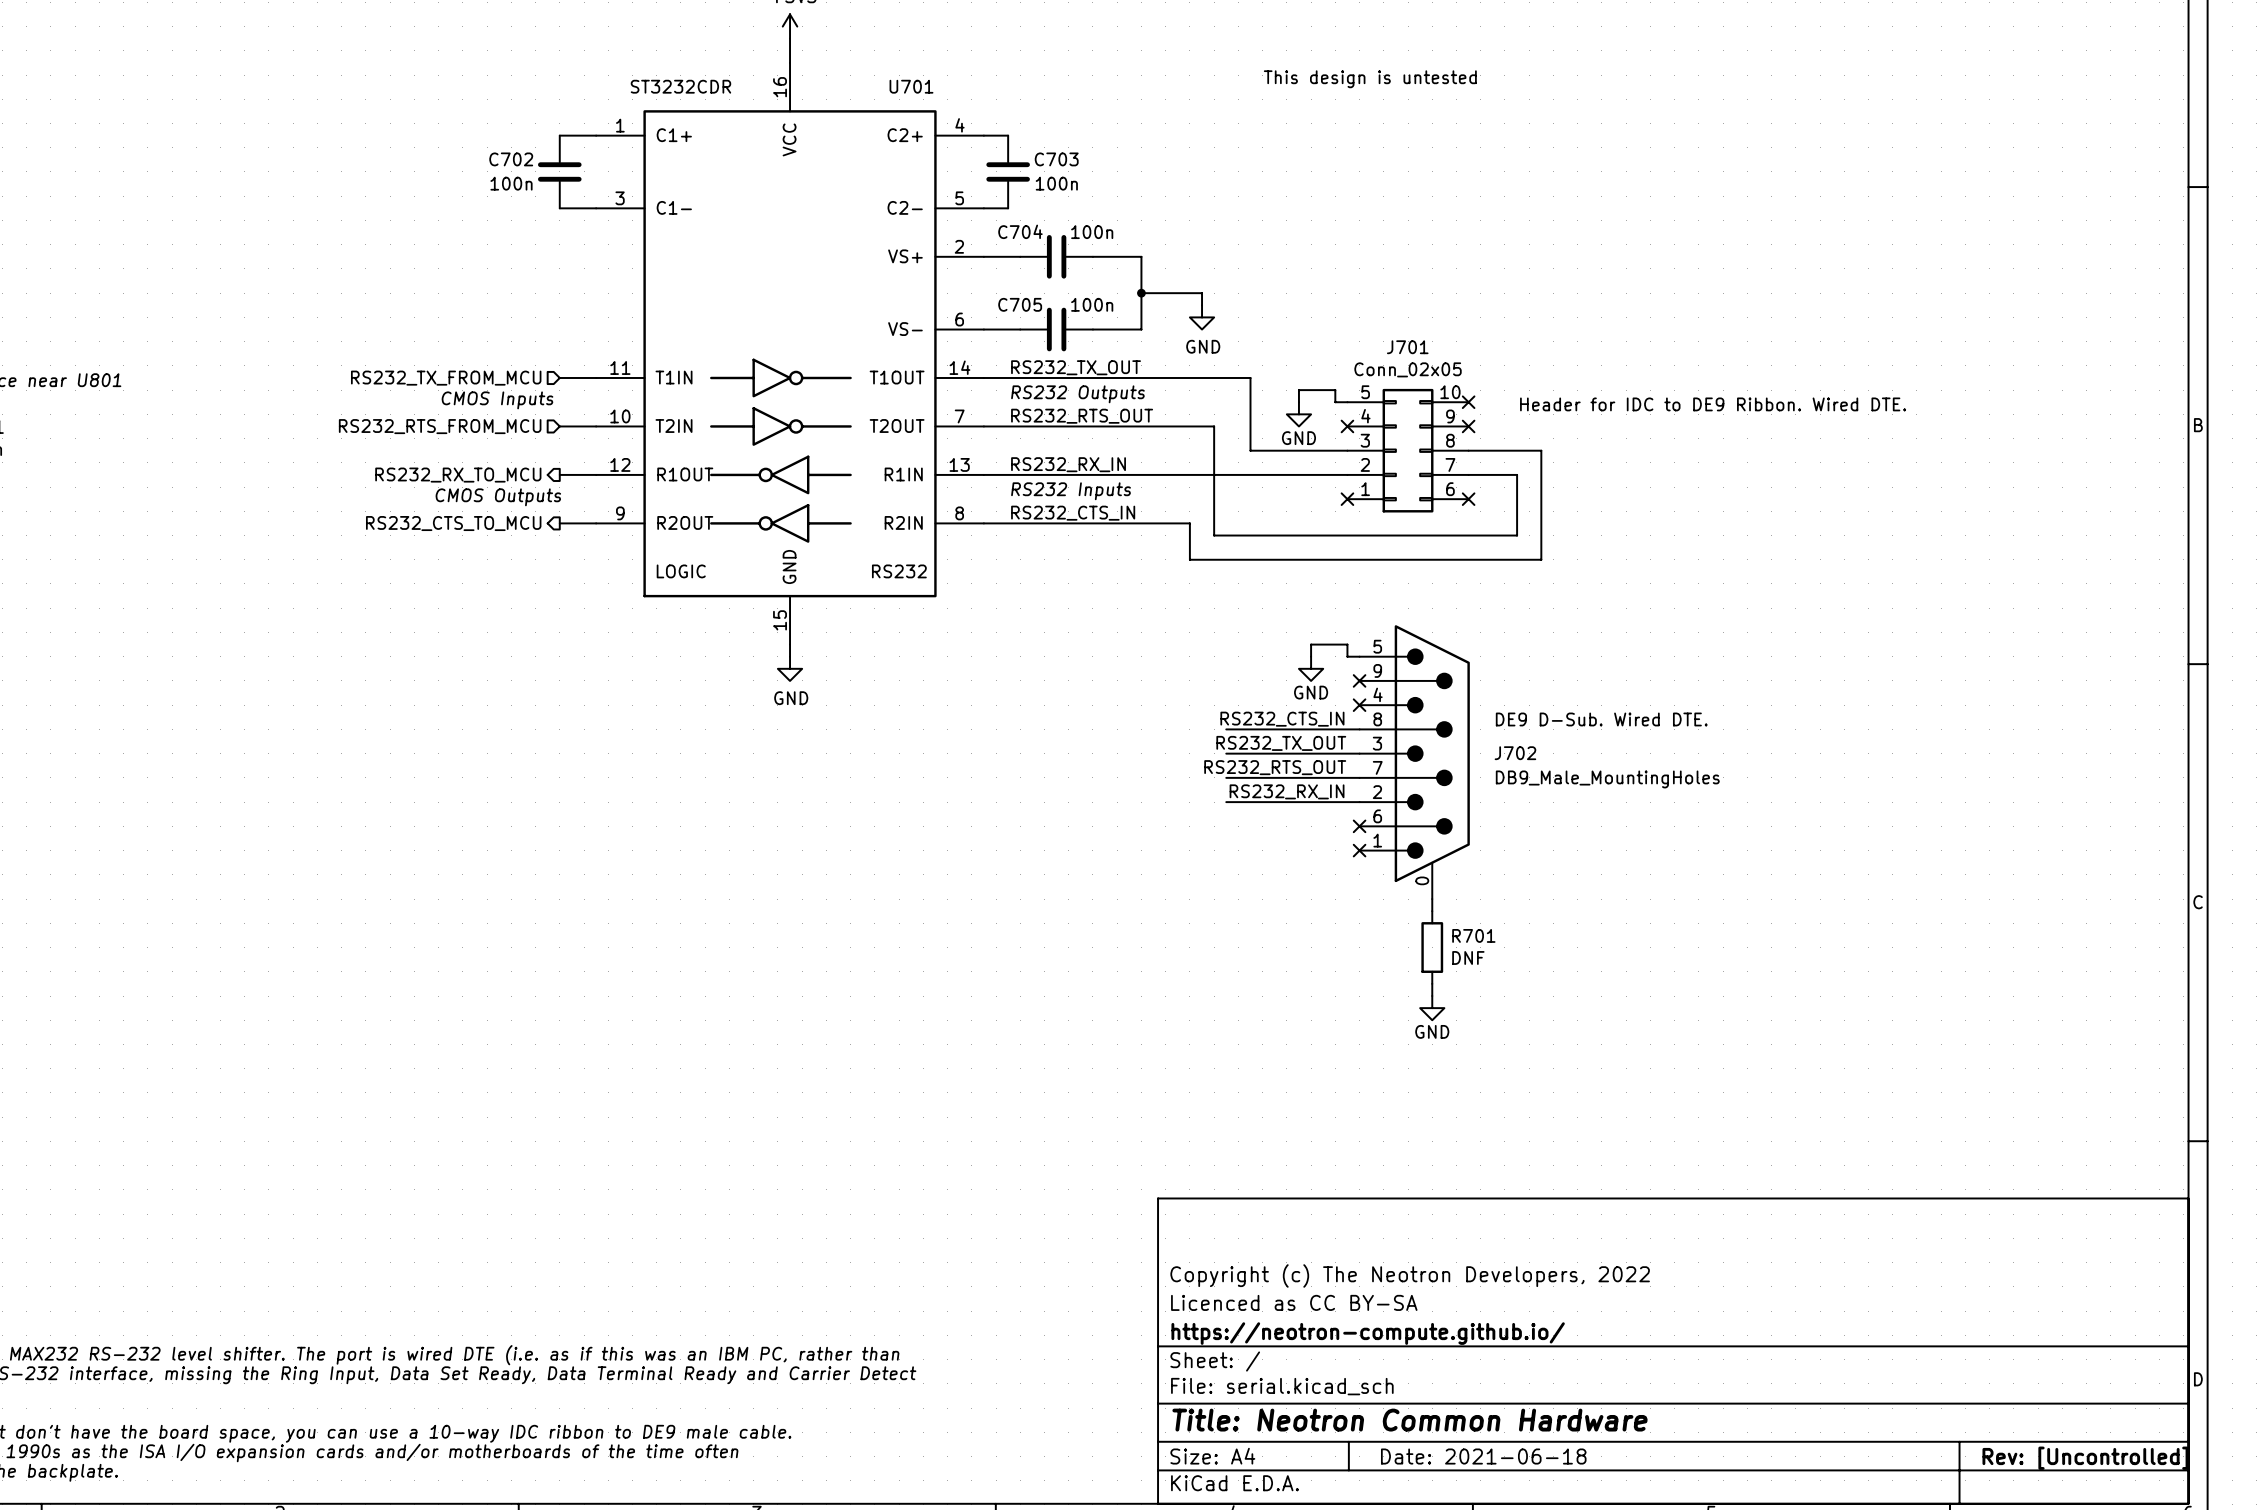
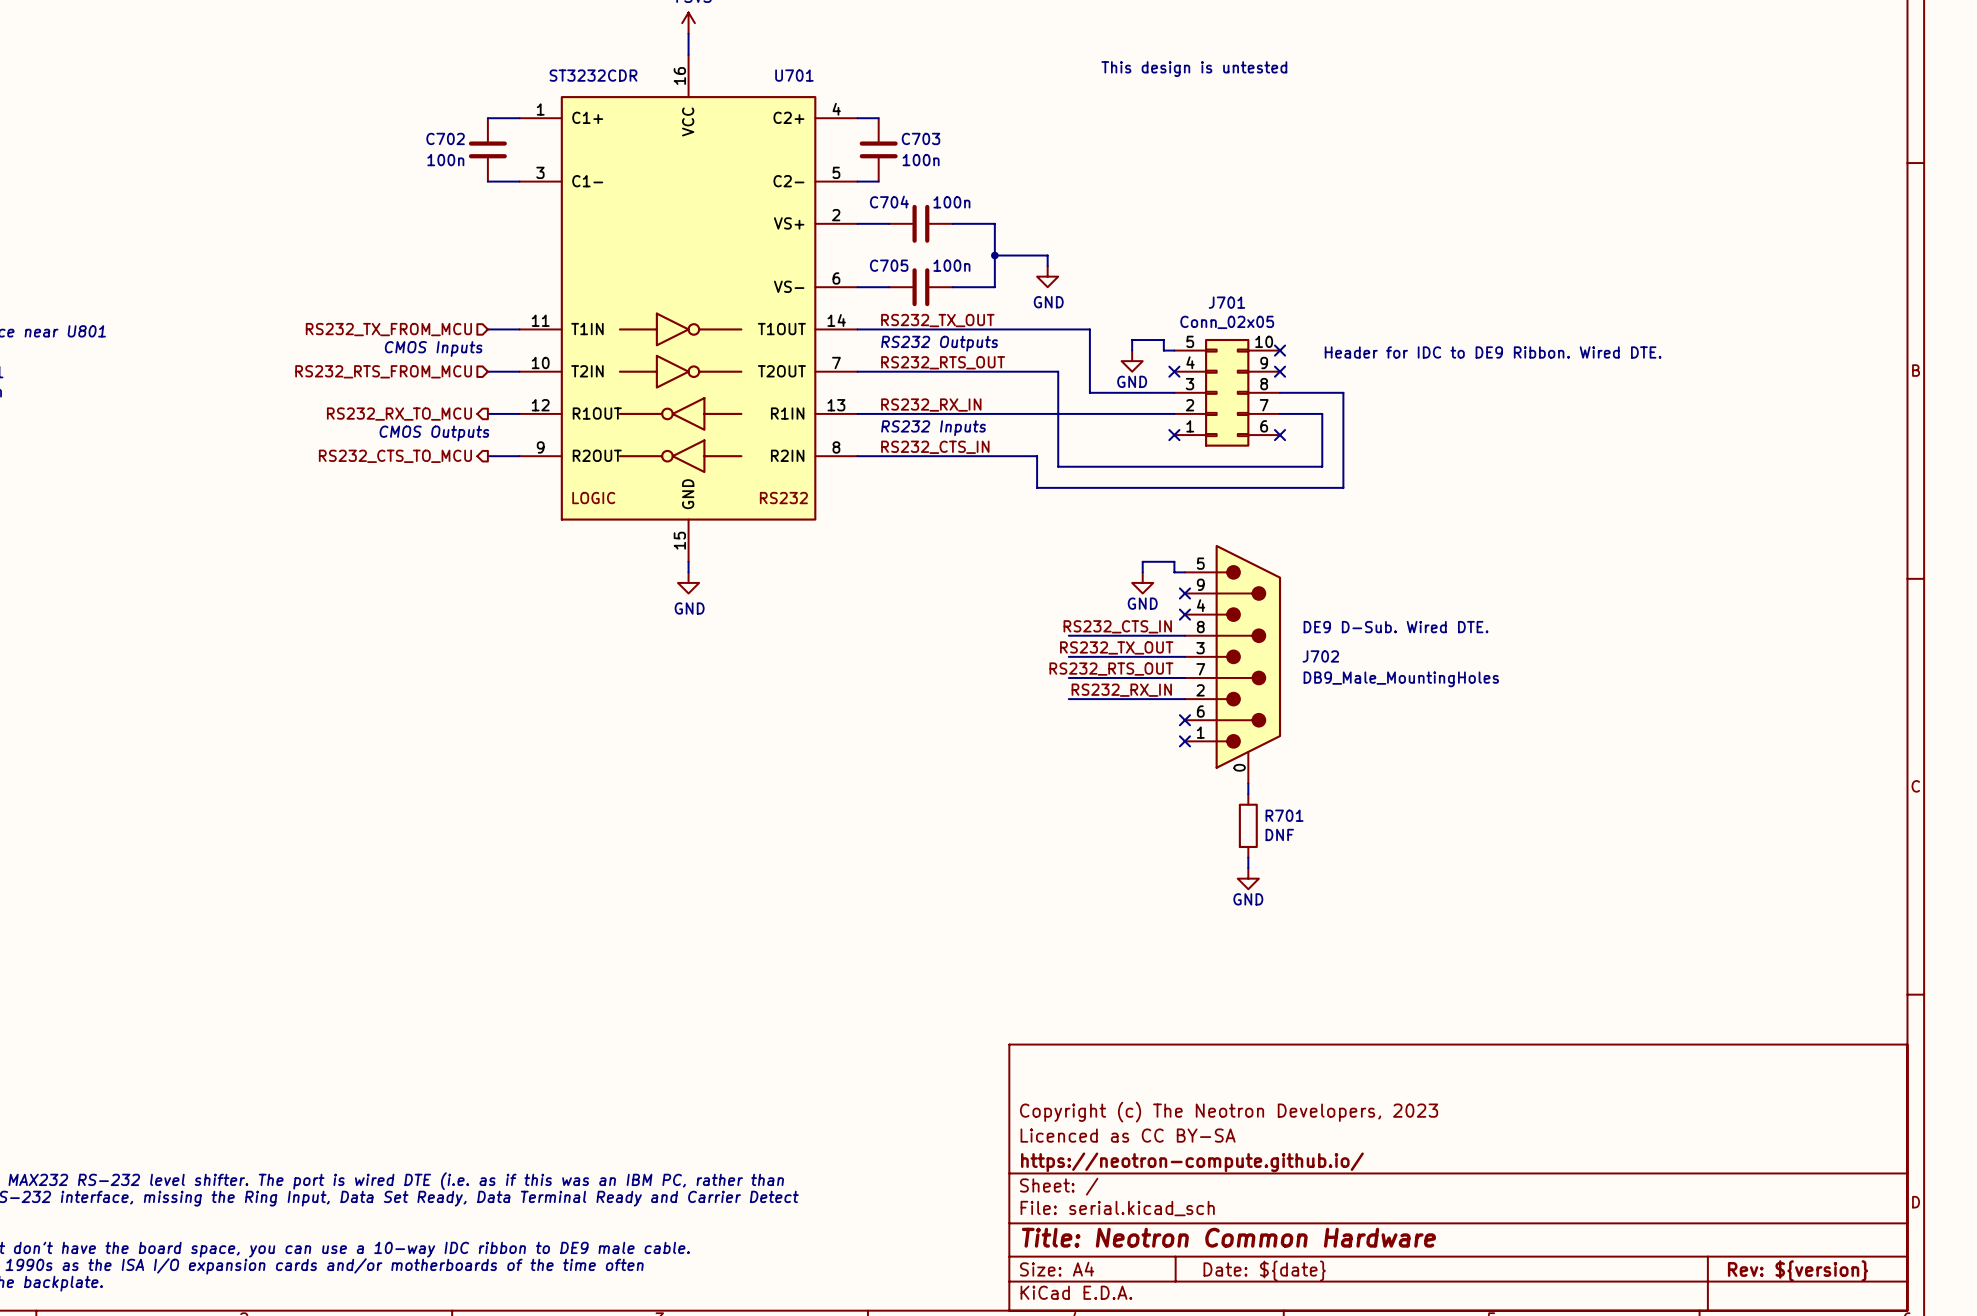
title block: Copyright (c) The Neotron Developers, 2022 (1410, 1275) -> Copyright (c) The Neotron Developers, 2023 (1229, 1112)
title block: Date: 2021-06-18 (1483, 1456) -> Date: ${date} (1264, 1270)
title block: Rev: [Uncontrolled] (2085, 1458) -> Rev: ${version} (1798, 1270)

